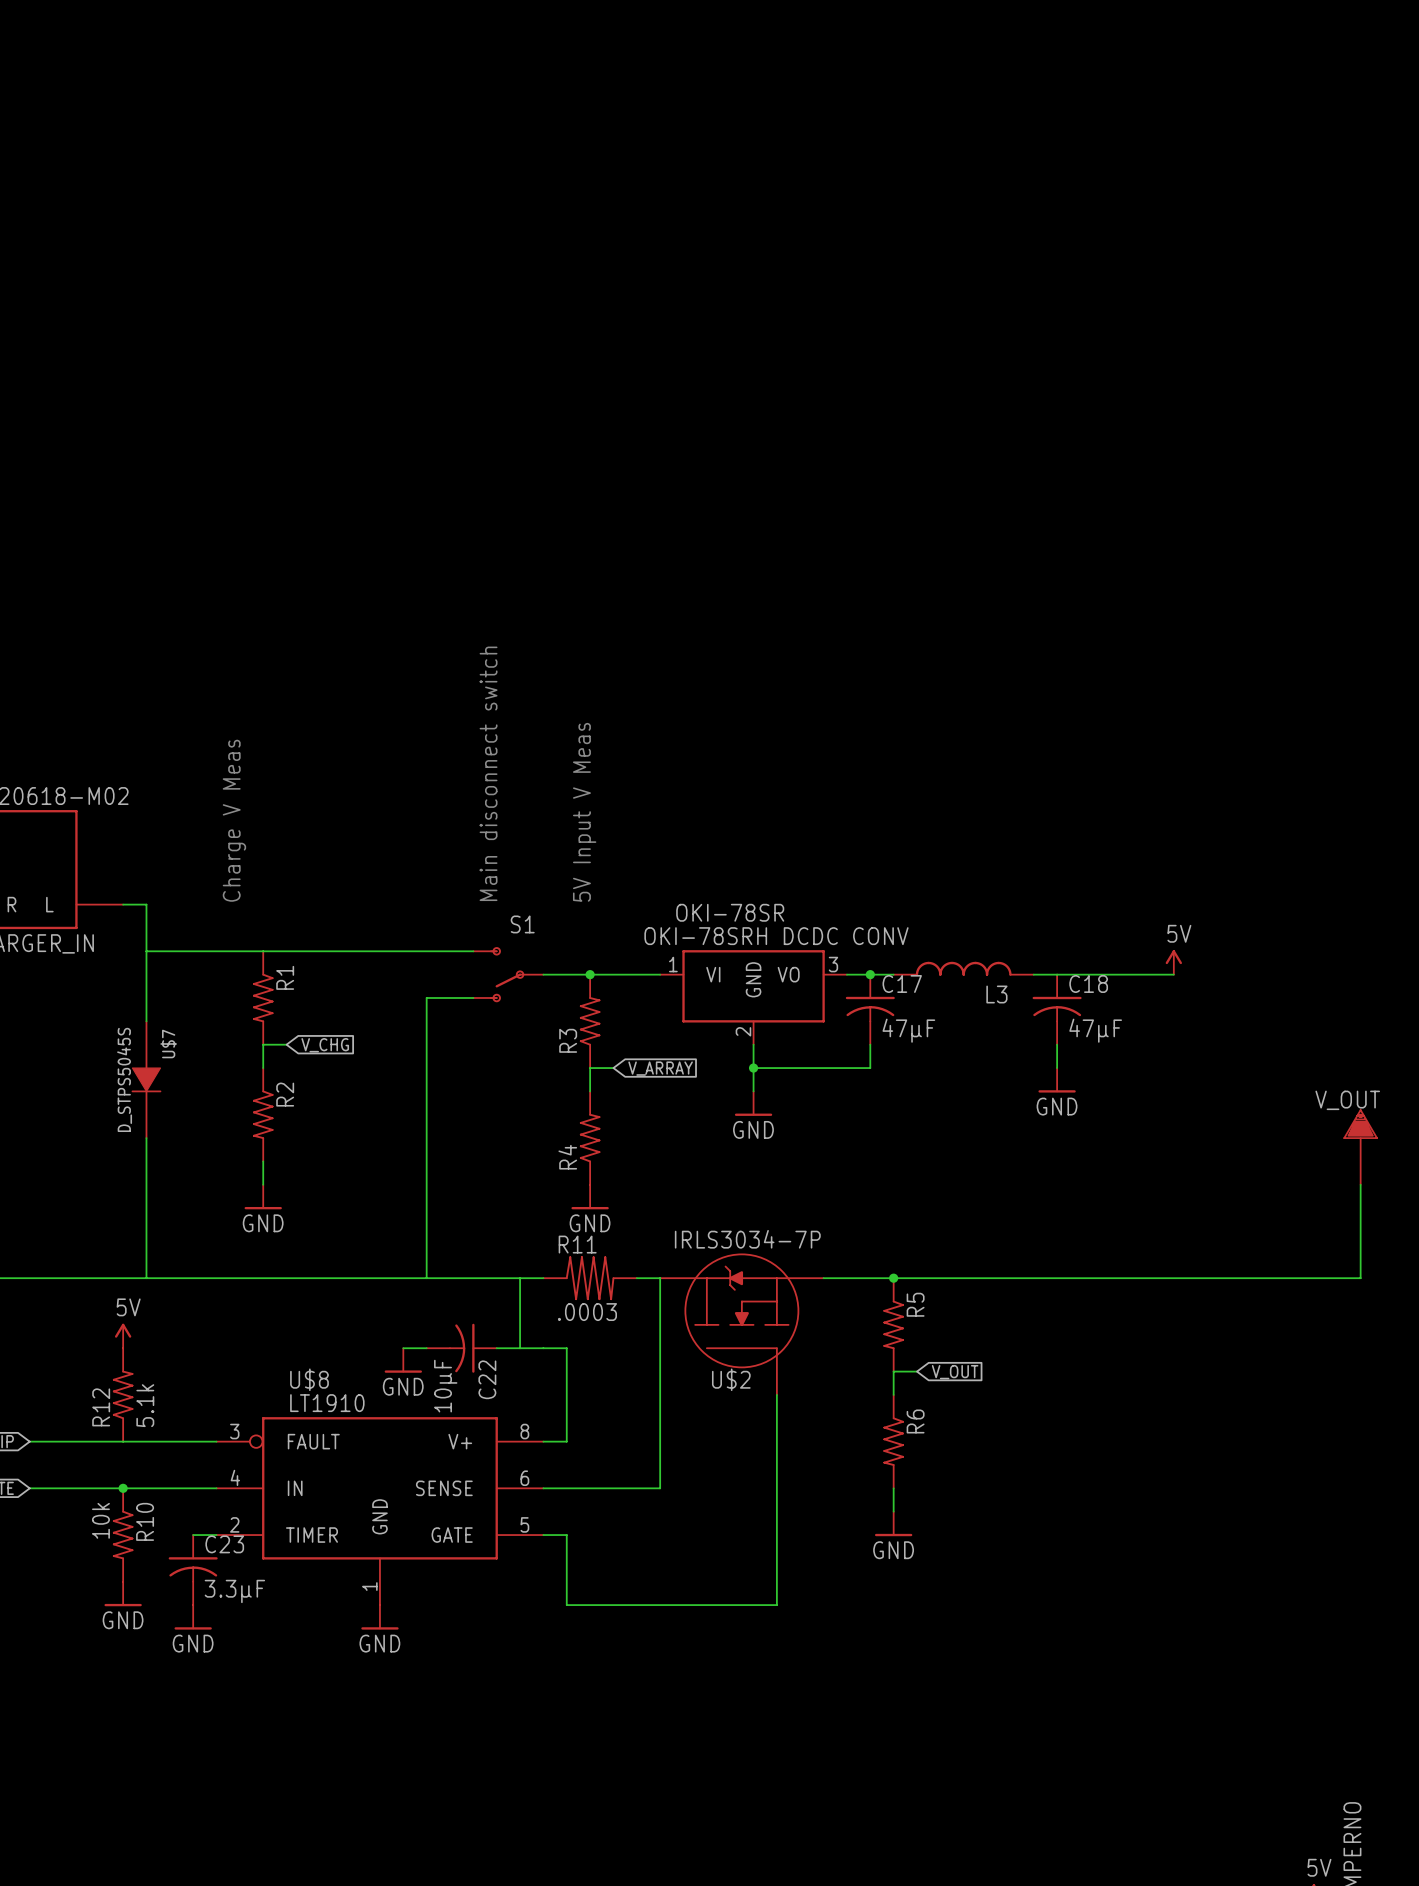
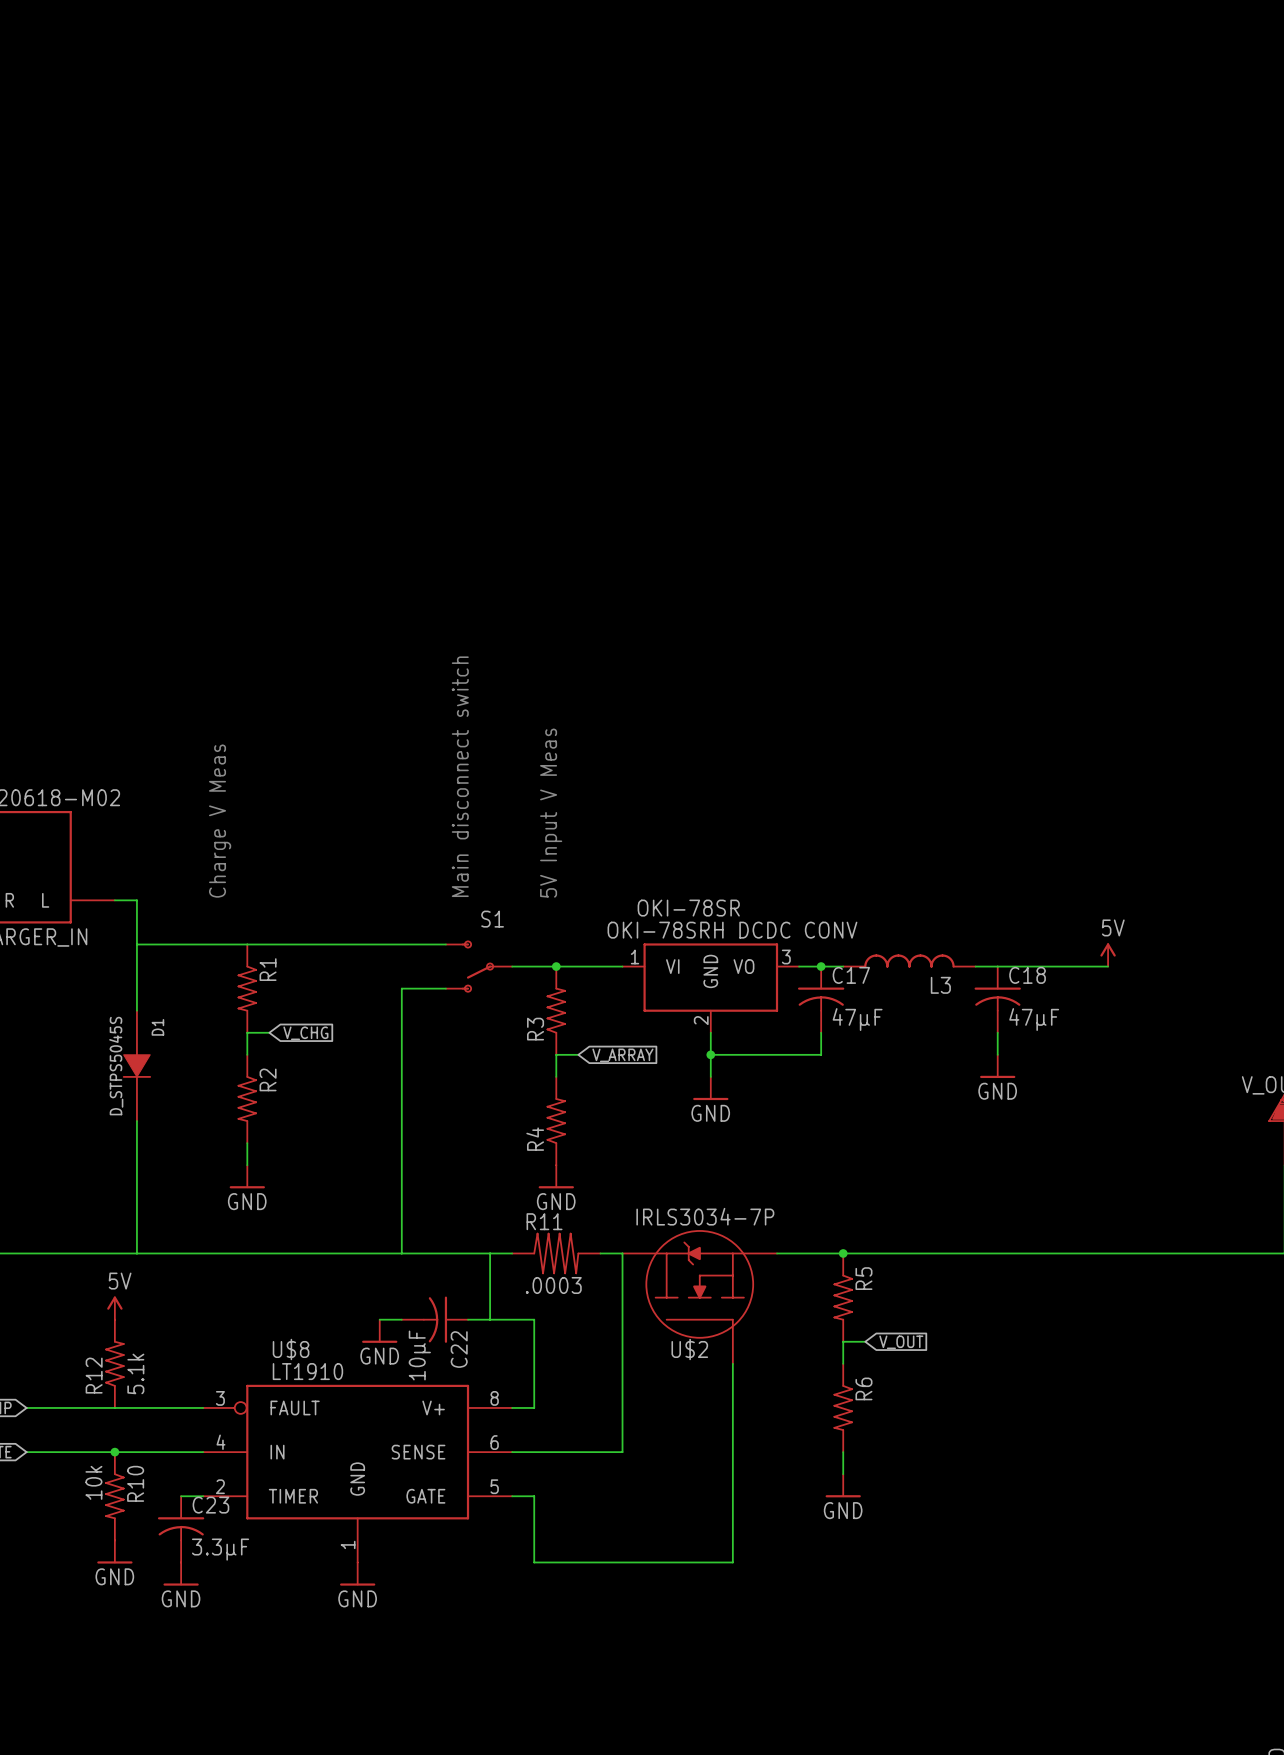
U$7 name: U$7 (168, 1043) -> D1 (157, 1027)

